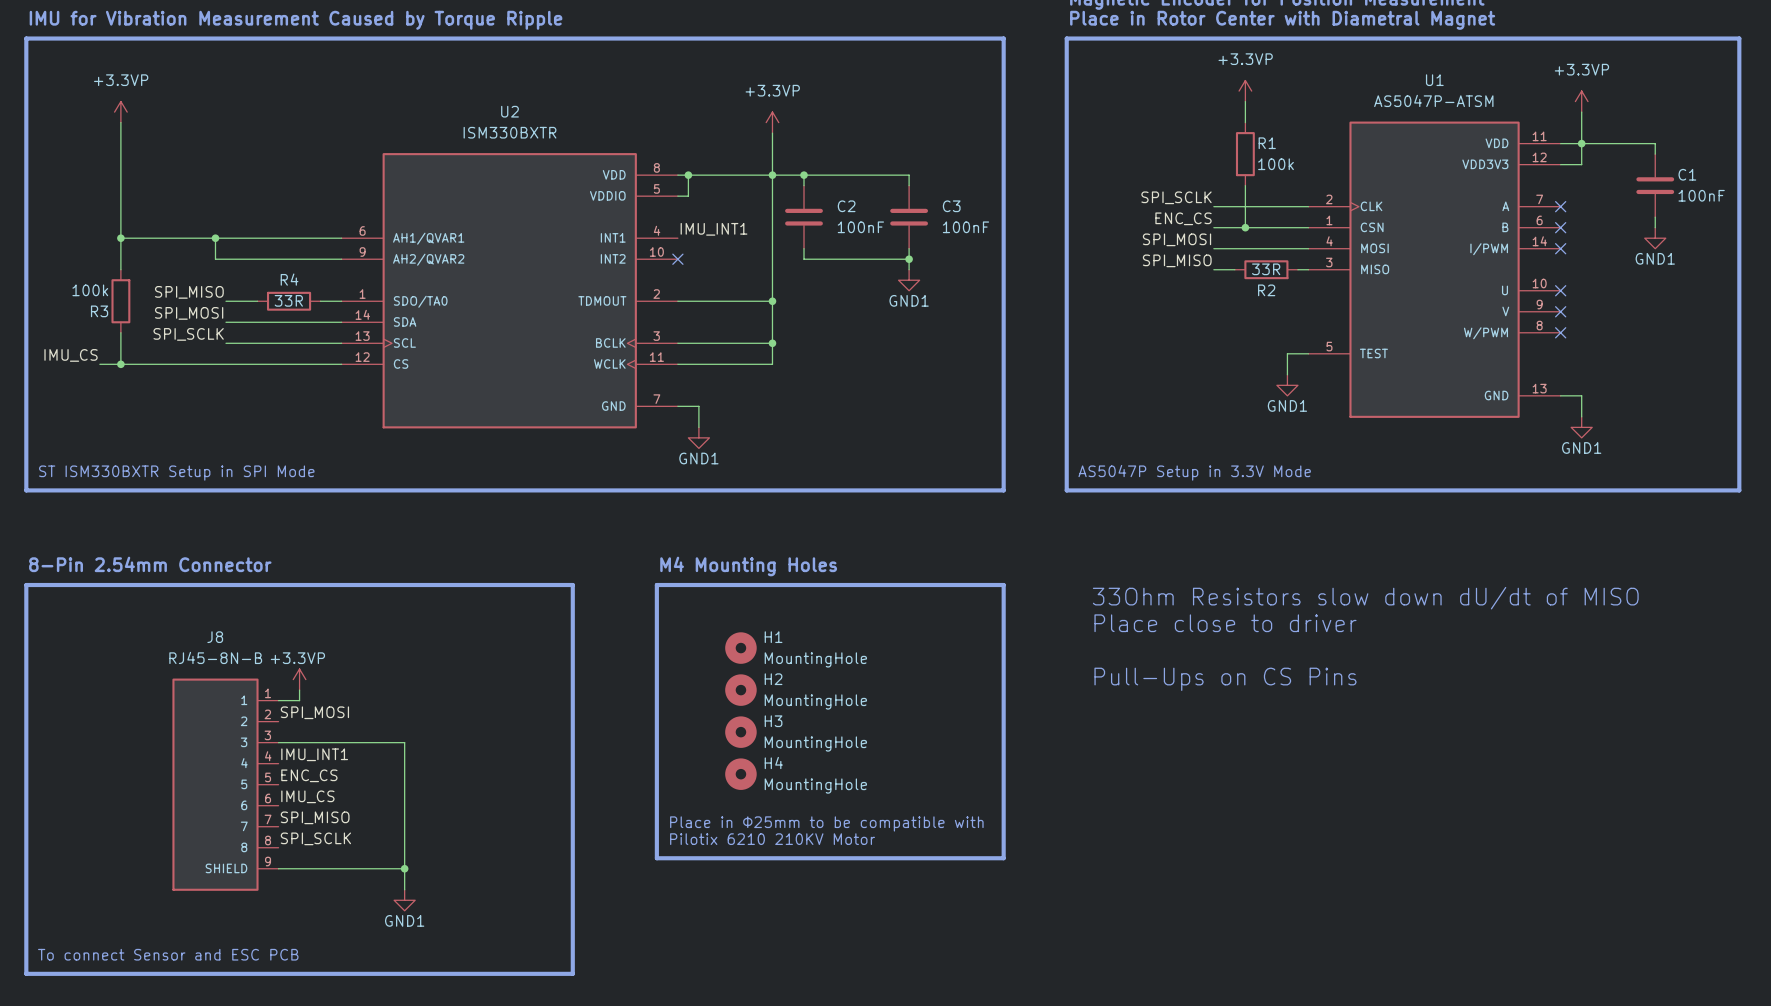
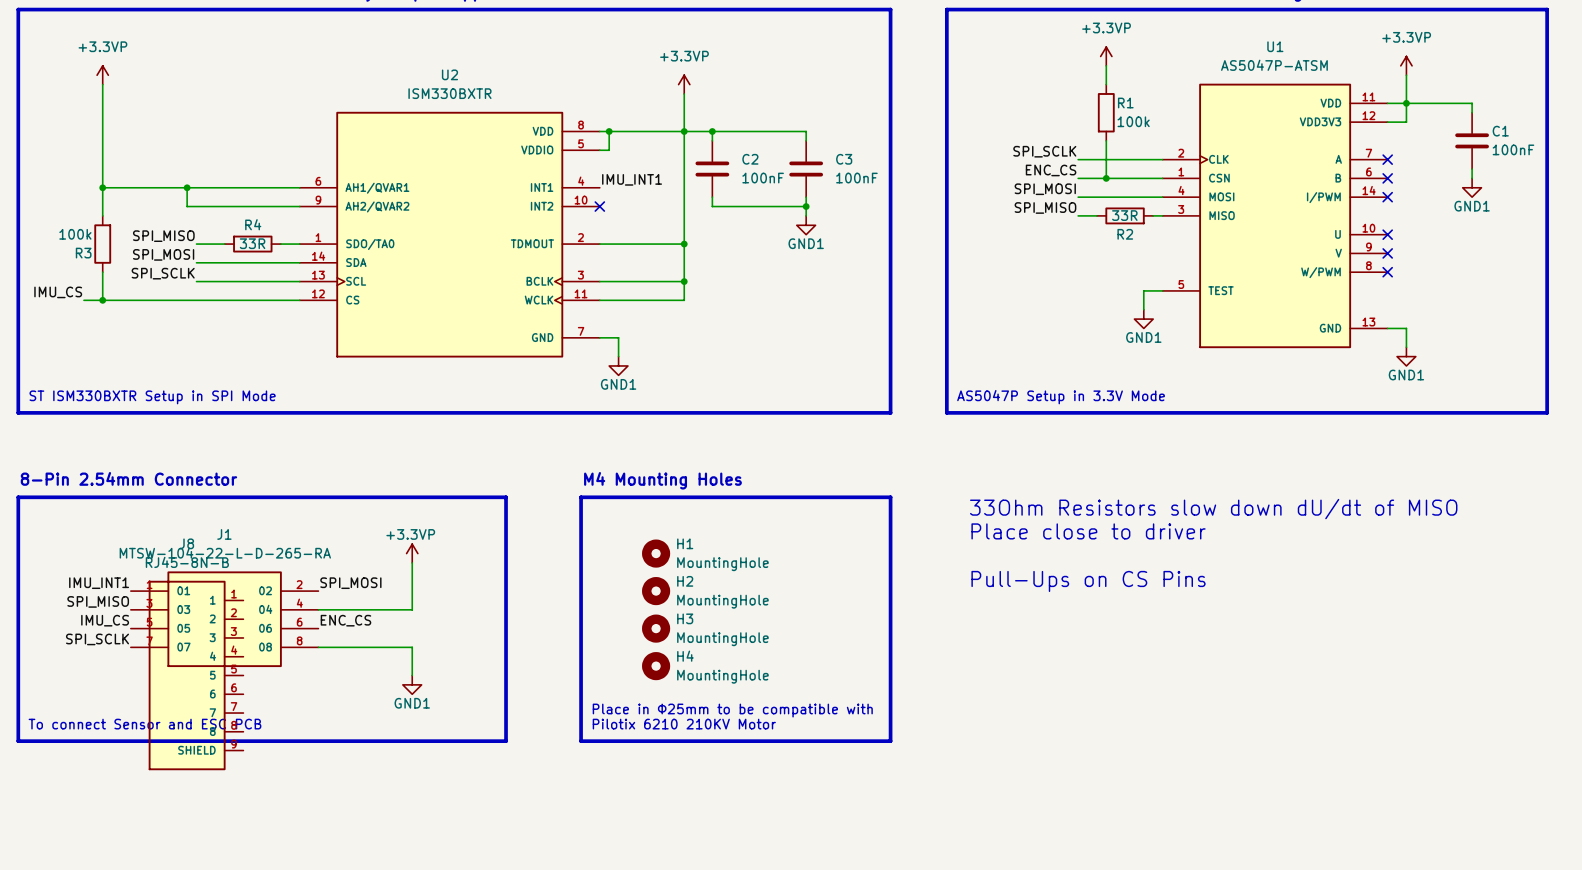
wire: none -> (412, 562) (412, 609) (318, 609)
power symbol position: +3.3VP (299, 679) -> +3.3VP (412, 553)
label position: SPI_MOSI (314, 712) -> SPI_MOSI (350, 583)
J1: none -> MTSW-104-22-L-D-265-RA (224, 619)
wire: (278, 742) (404, 742) (404, 889) -> none
wire: none -> (318, 647) (412, 647) (412, 675)
label position: IMU_INT1 (314, 754) -> IMU_INT1 (99, 583)
label position: ENC_CS (309, 775) -> ENC_CS (345, 620)
label position: IMU_CS (307, 796) -> IMU_CS (105, 620)
label position: SPI_MISO (315, 817) -> SPI_MISO (98, 601)
label position: SPI_SCLK (315, 838) -> SPI_SCLK (97, 639)
line: (26, 858) (26, 973) (572, 973) (572, 858) -> (18, 741) (506, 741)
wire: (278, 868) (404, 868) -> none
junction: (404, 868) -> none
power symbol position: GND1 (404, 900) -> GND1 (412, 684)
text position: To connect Sensor and ESC PCB (168, 954) -> To connect Sensor and ESC PCB (144, 724)

